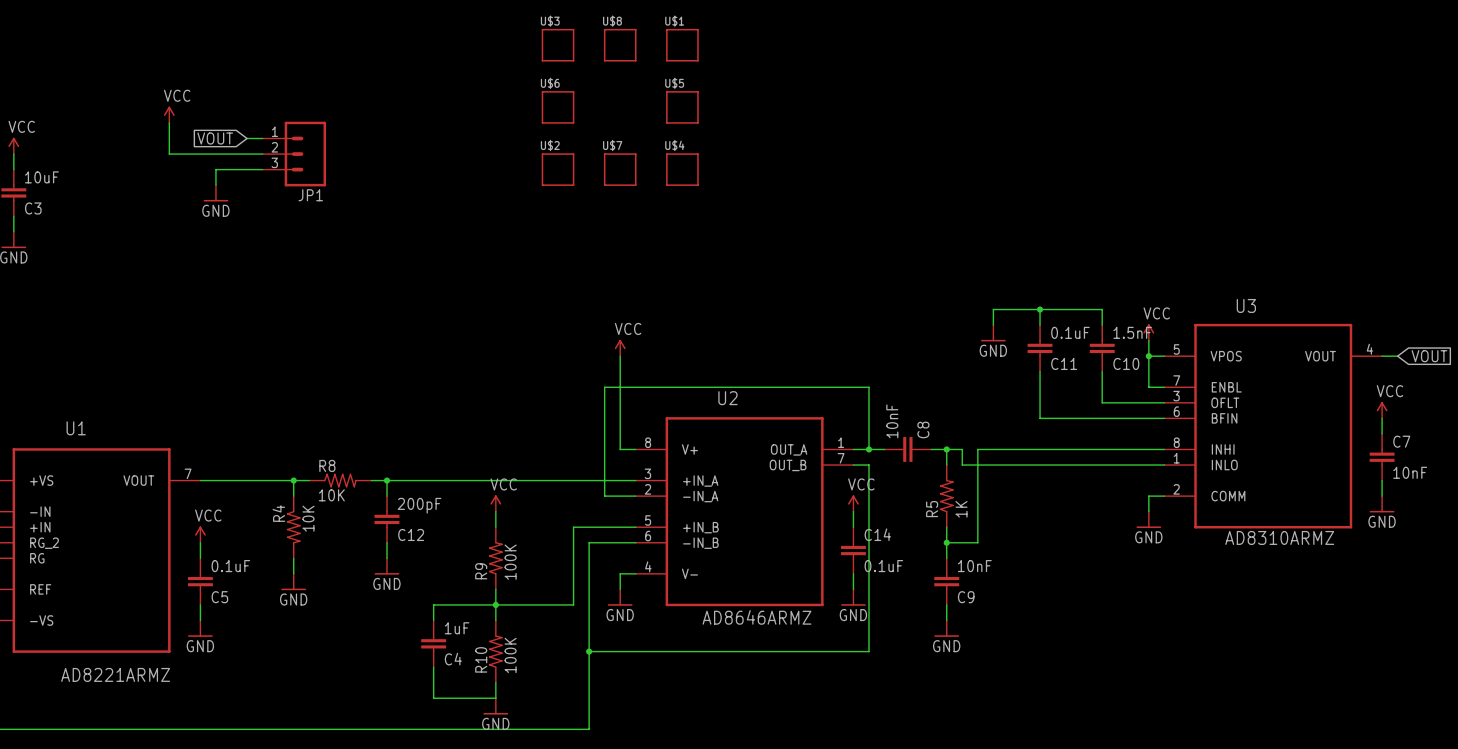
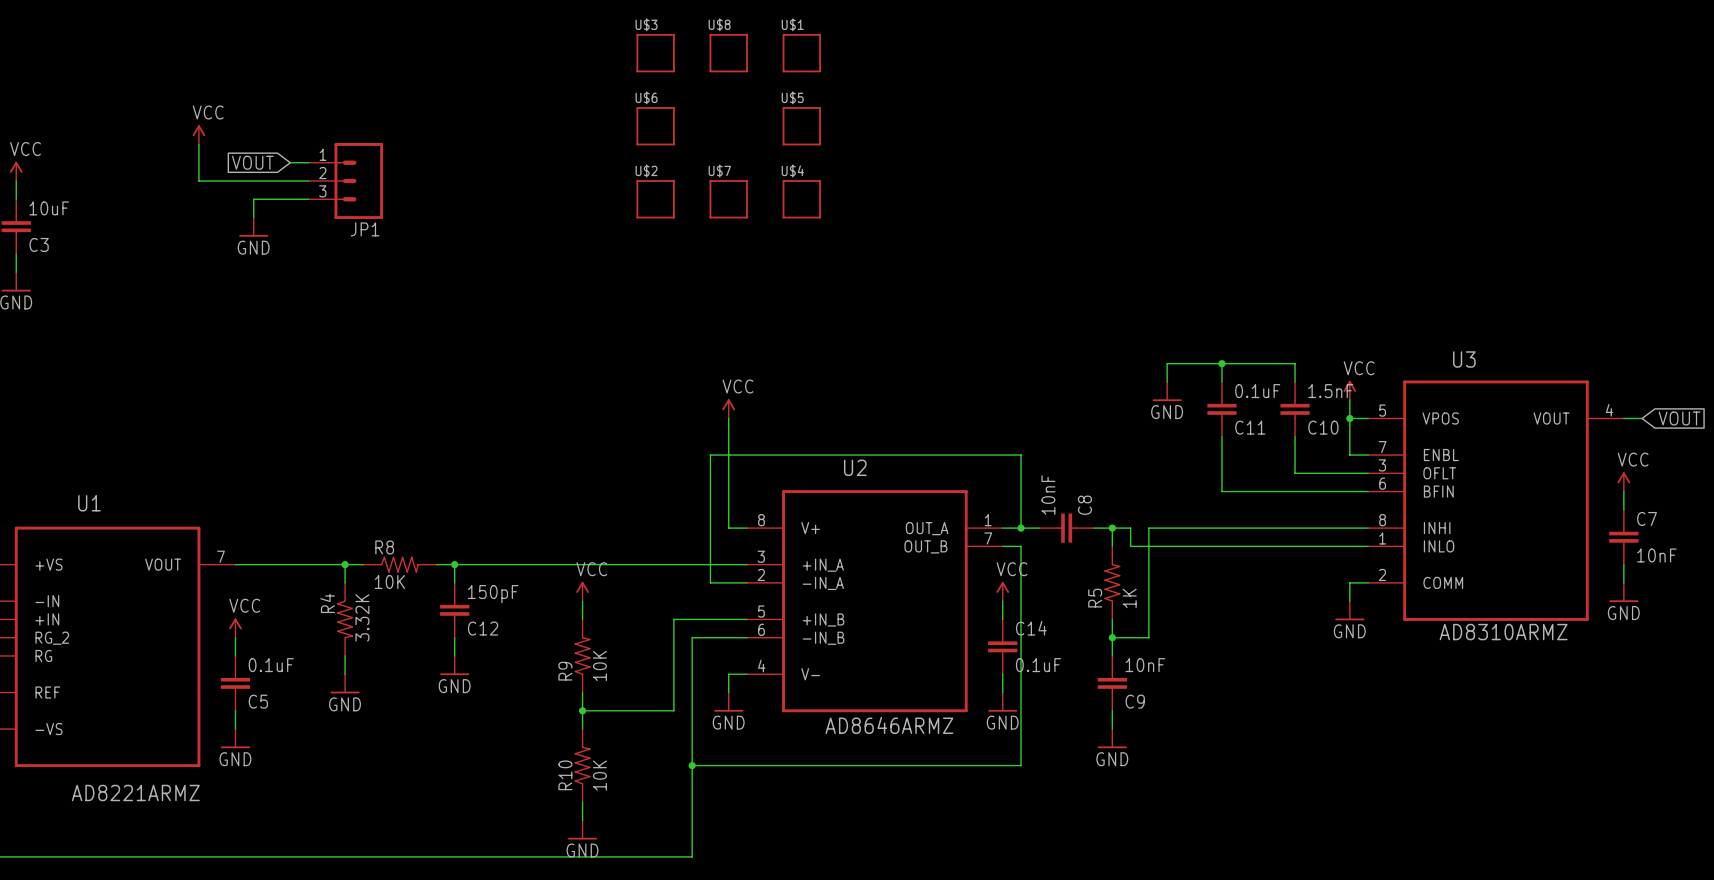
C12 value: 200pF (419, 505) -> 150pF (493, 594)
R4 value: 10K (308, 518) -> 3.32K (362, 617)
R9 value: 100K (510, 562) -> 10K (599, 665)
wire: (495, 604) (433, 604) (433, 620) -> none
C4: 1uF (433, 643) -> none
R10 value: 100K (510, 655) -> 10K (599, 775)
wire: (433, 667) (433, 698) (495, 698) -> none

